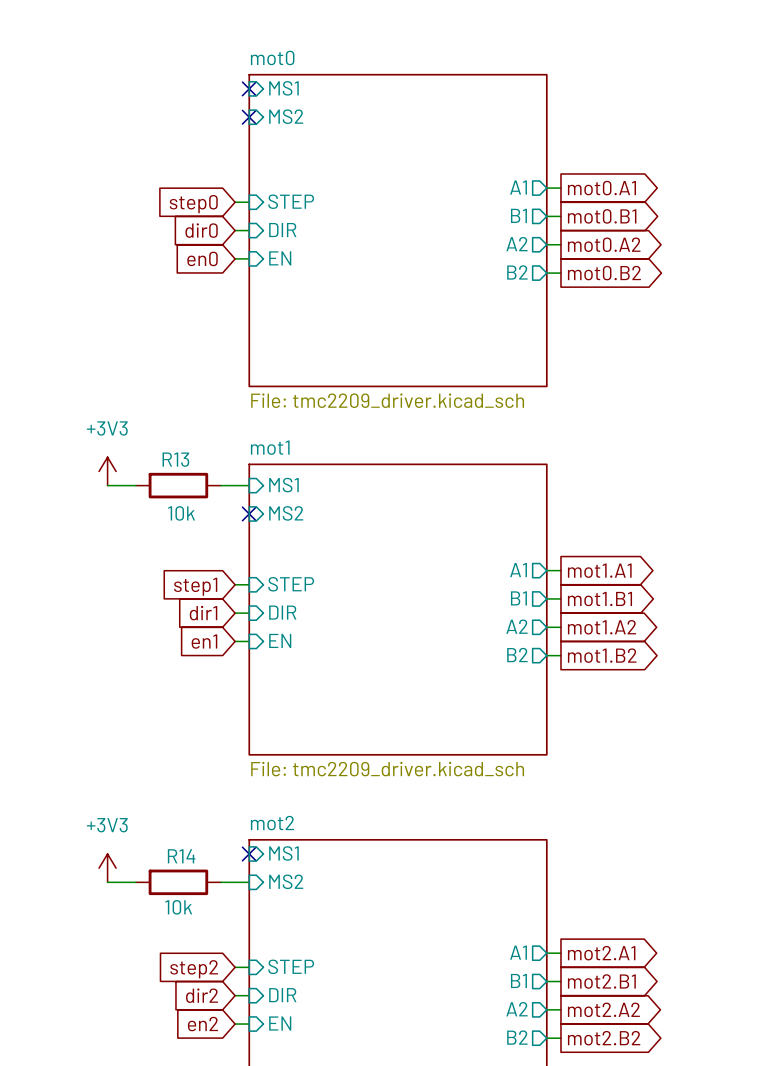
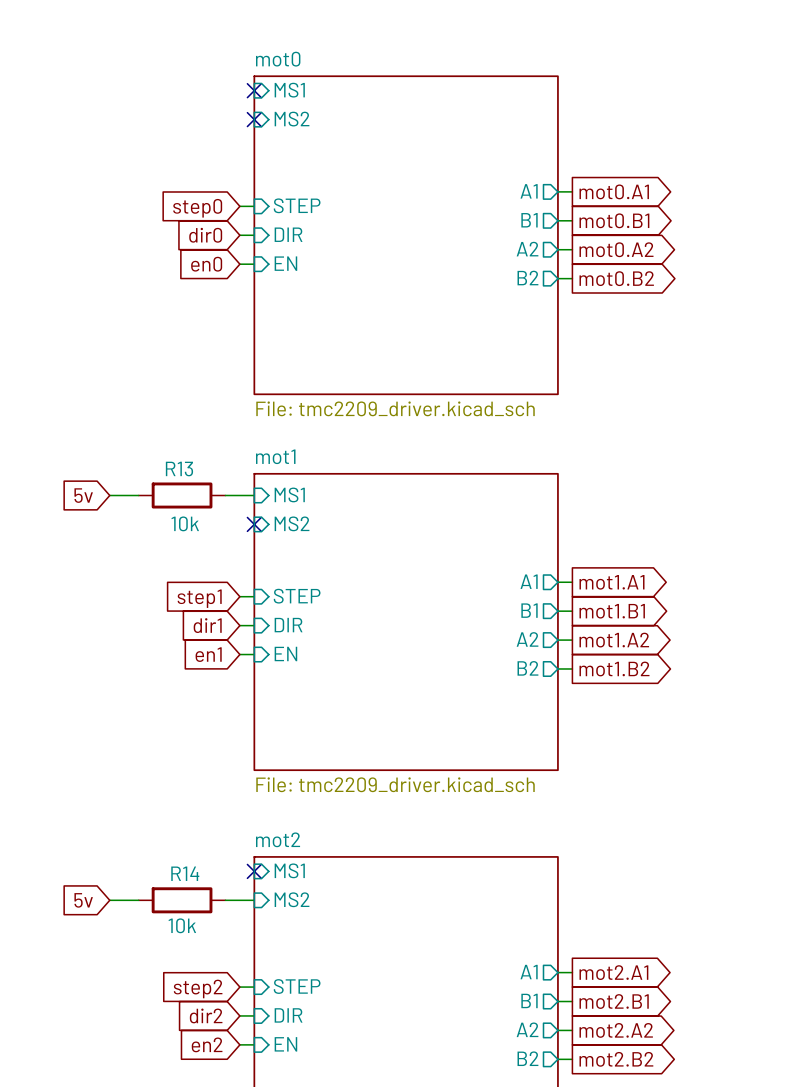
power symbol: +3V3 (107, 471) -> none
global label: none -> 5v (83, 495)
power symbol: +3V3 (107, 868) -> none
global label: none -> 5v (83, 900)

